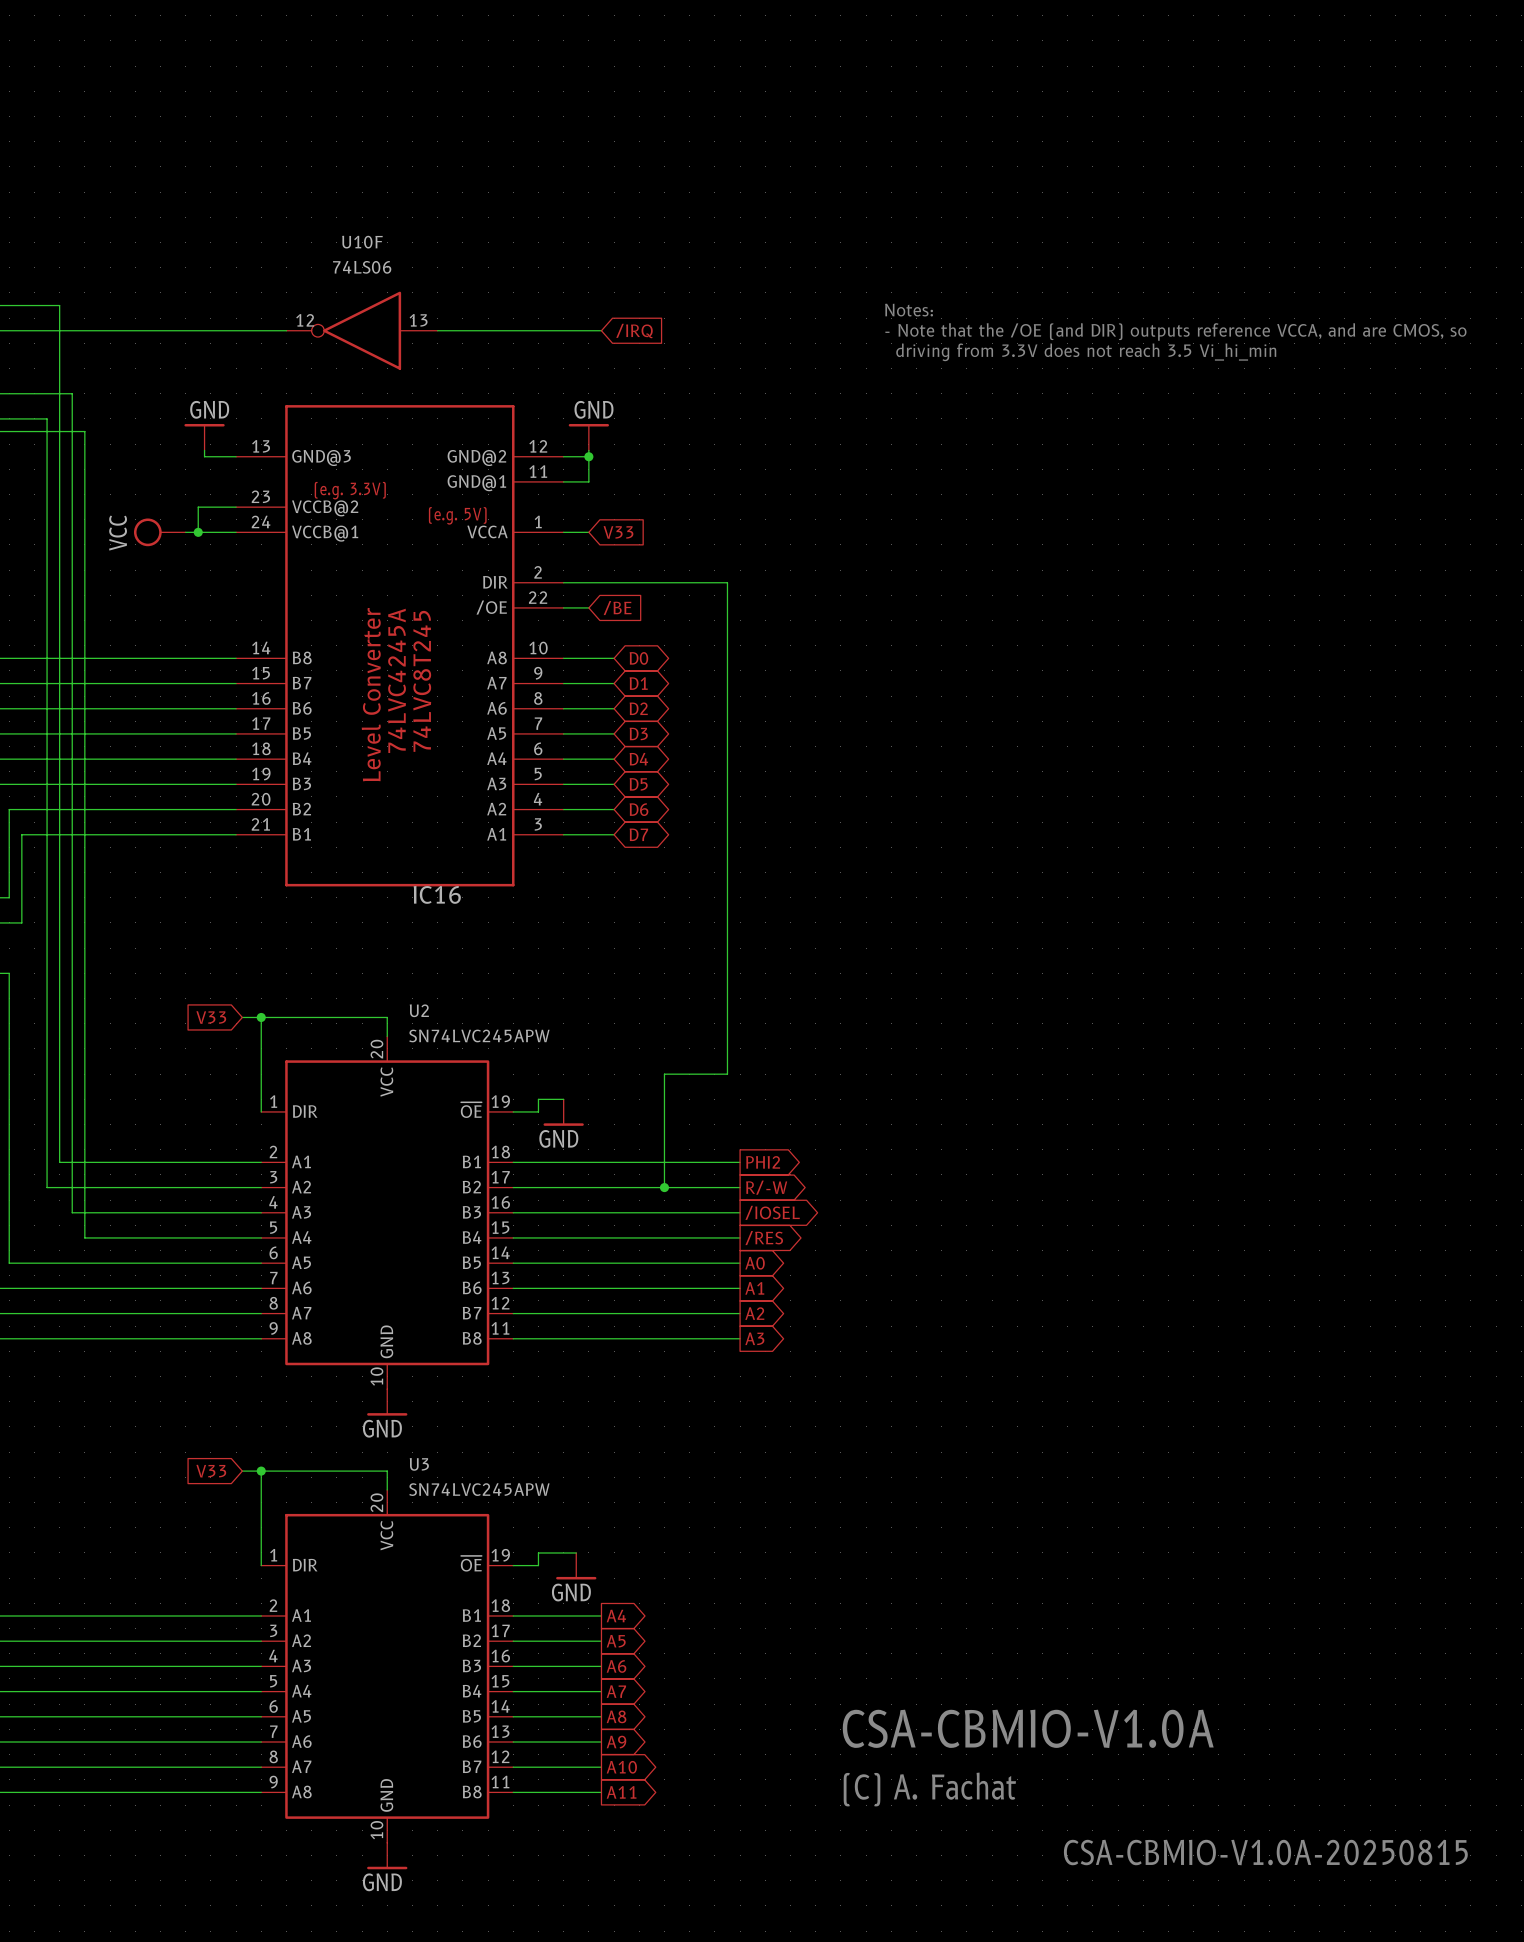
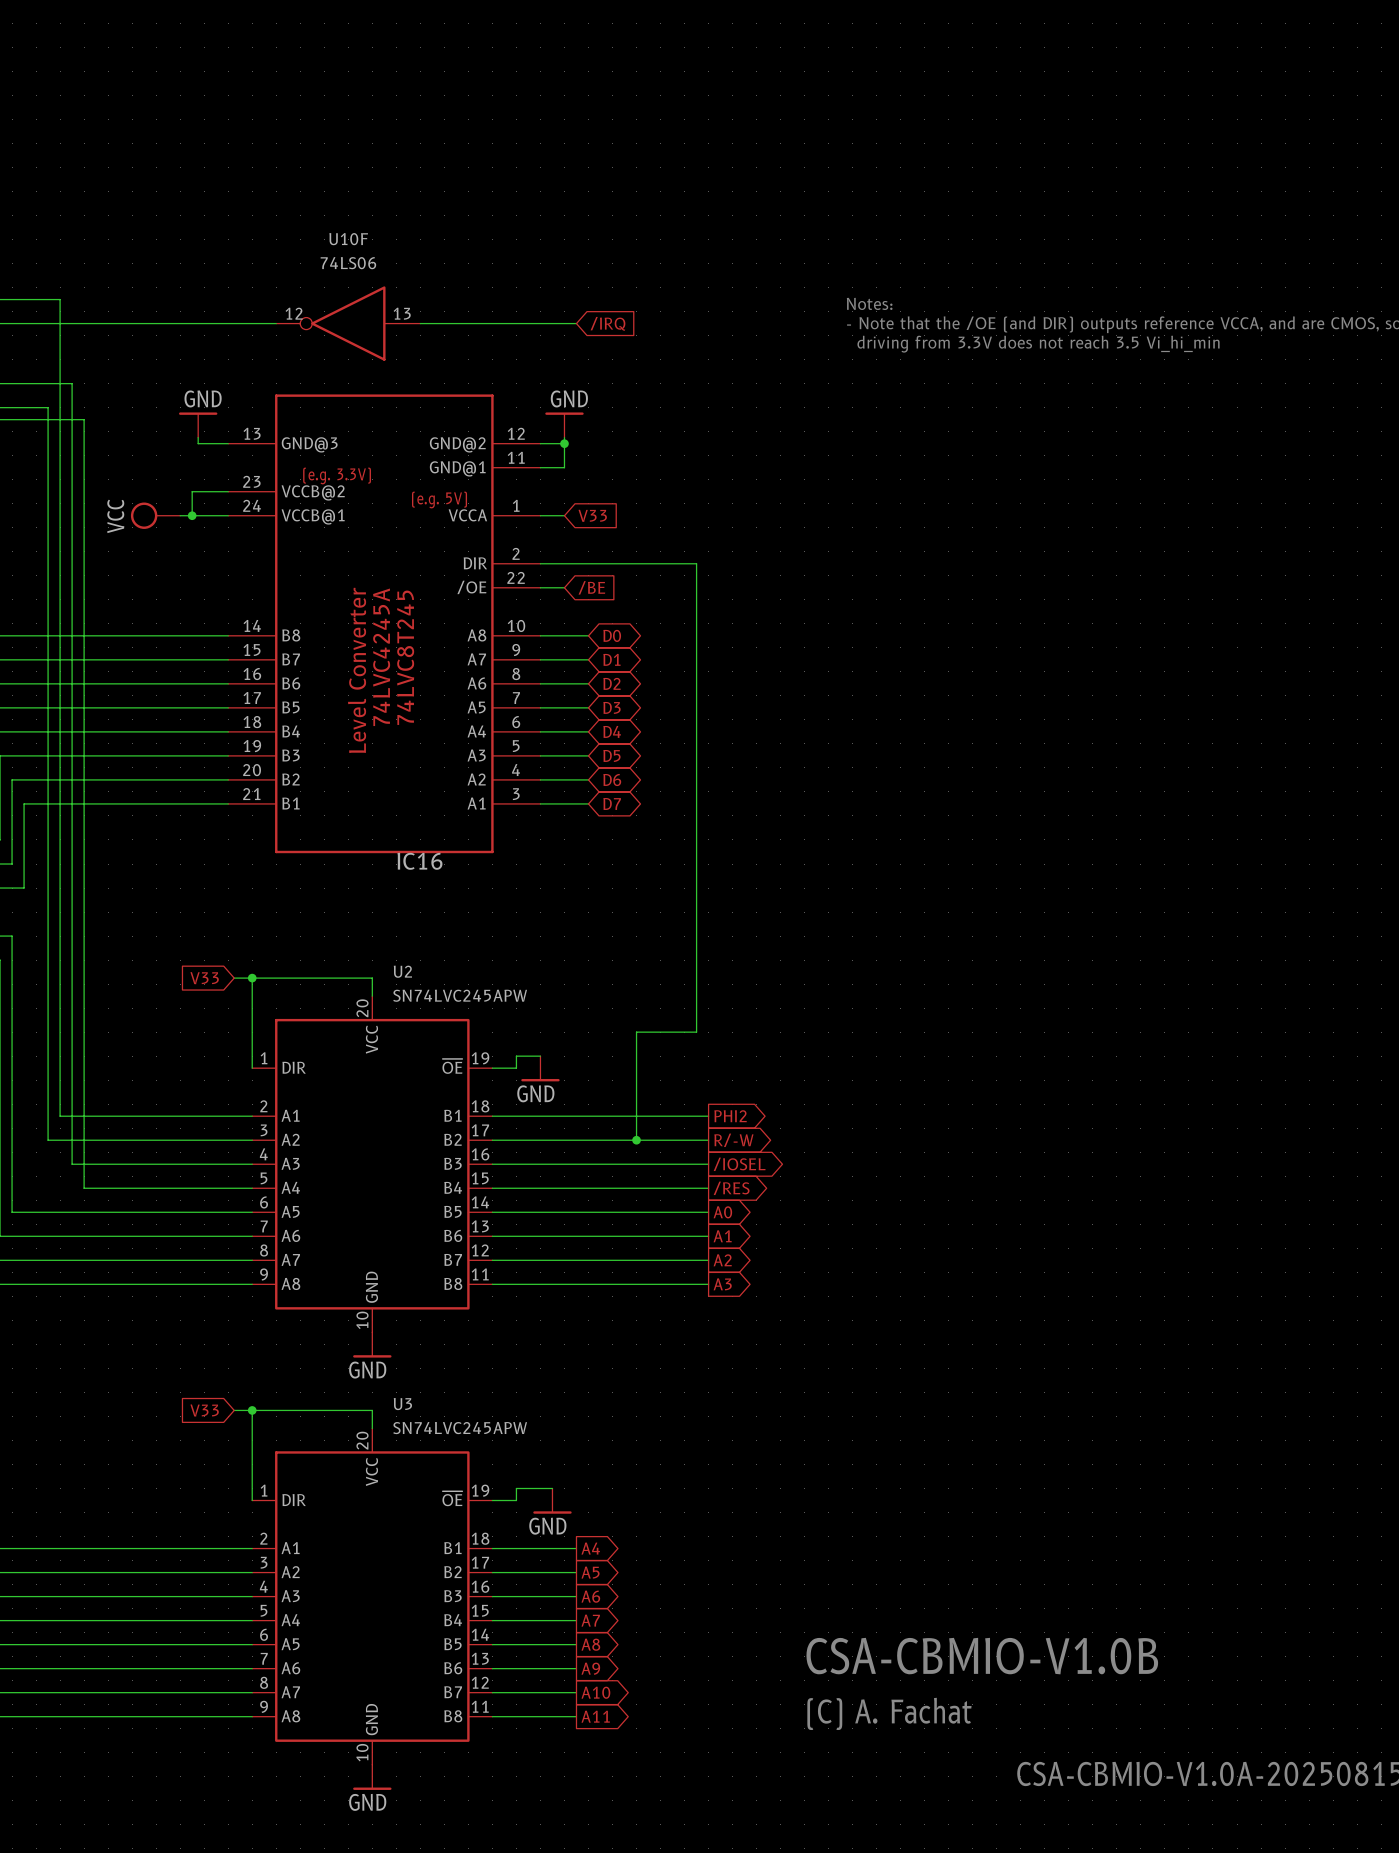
text: CSA-CBMIO-V1.0A (1028, 1728) -> CSA-CBMIO-V1.0B (982, 1656)

